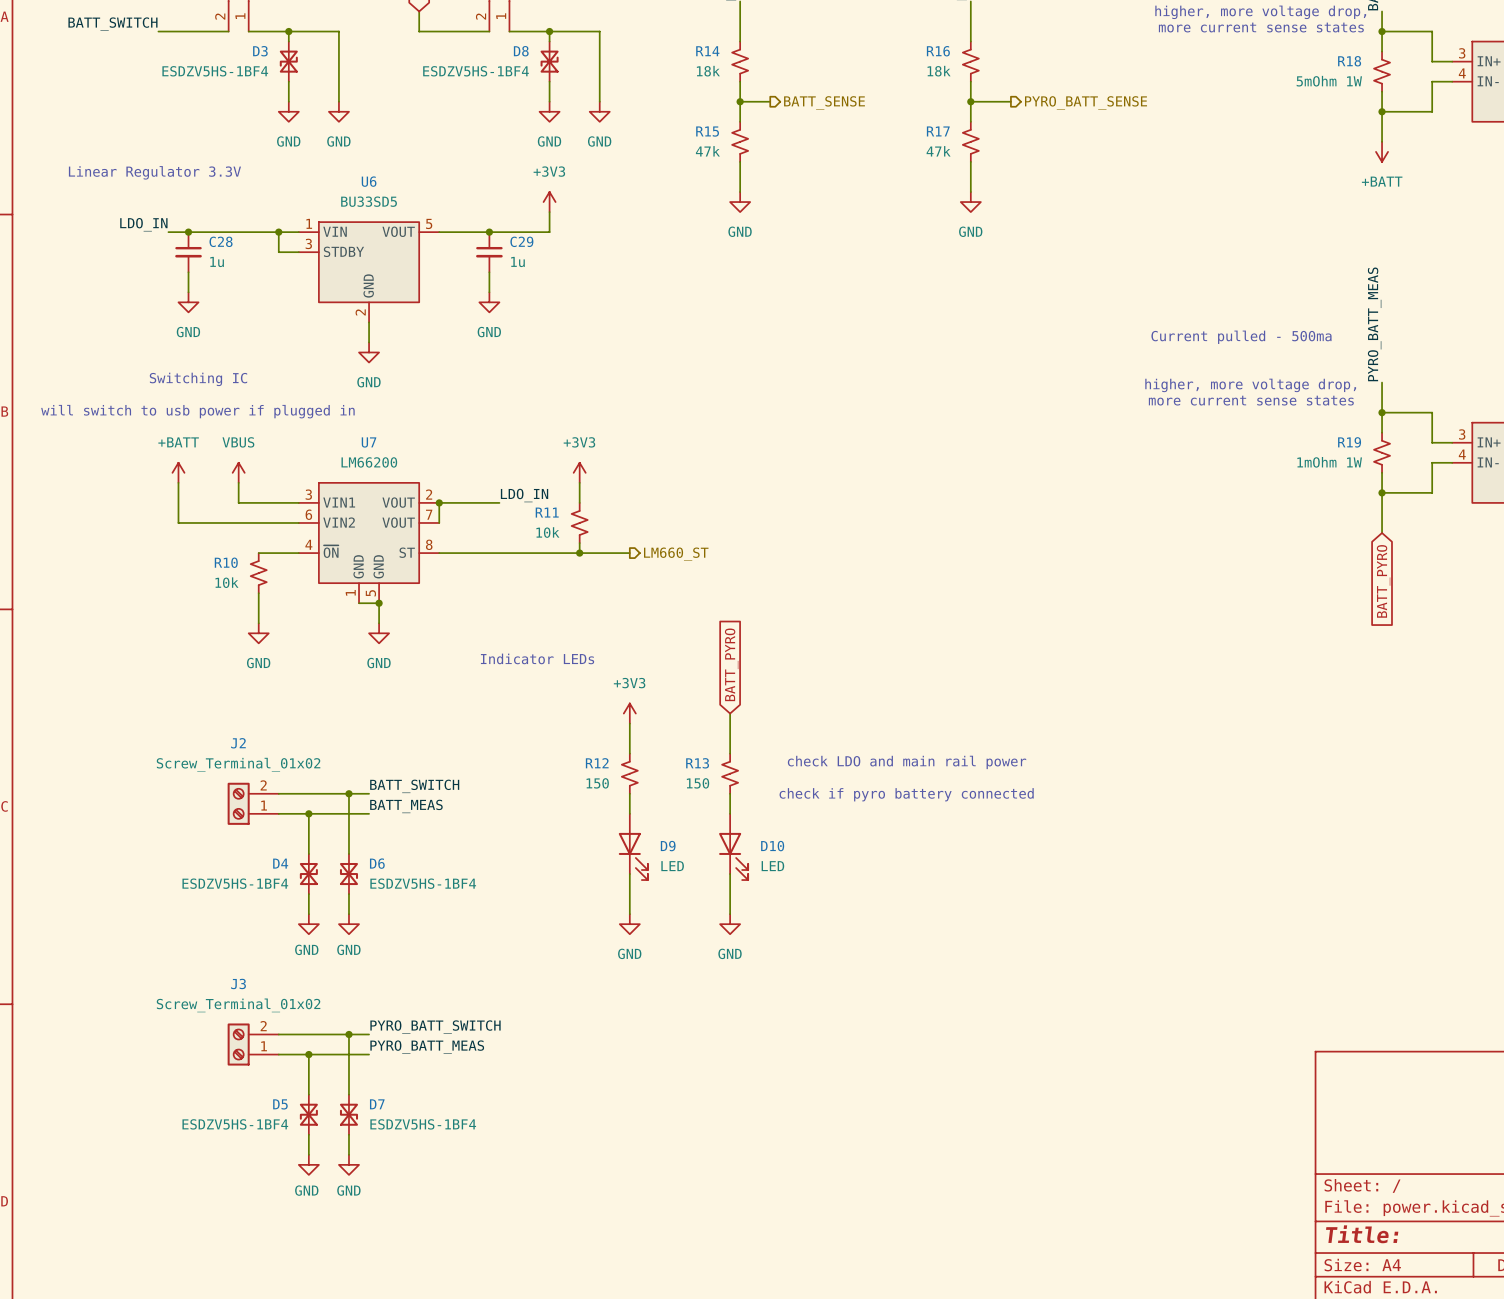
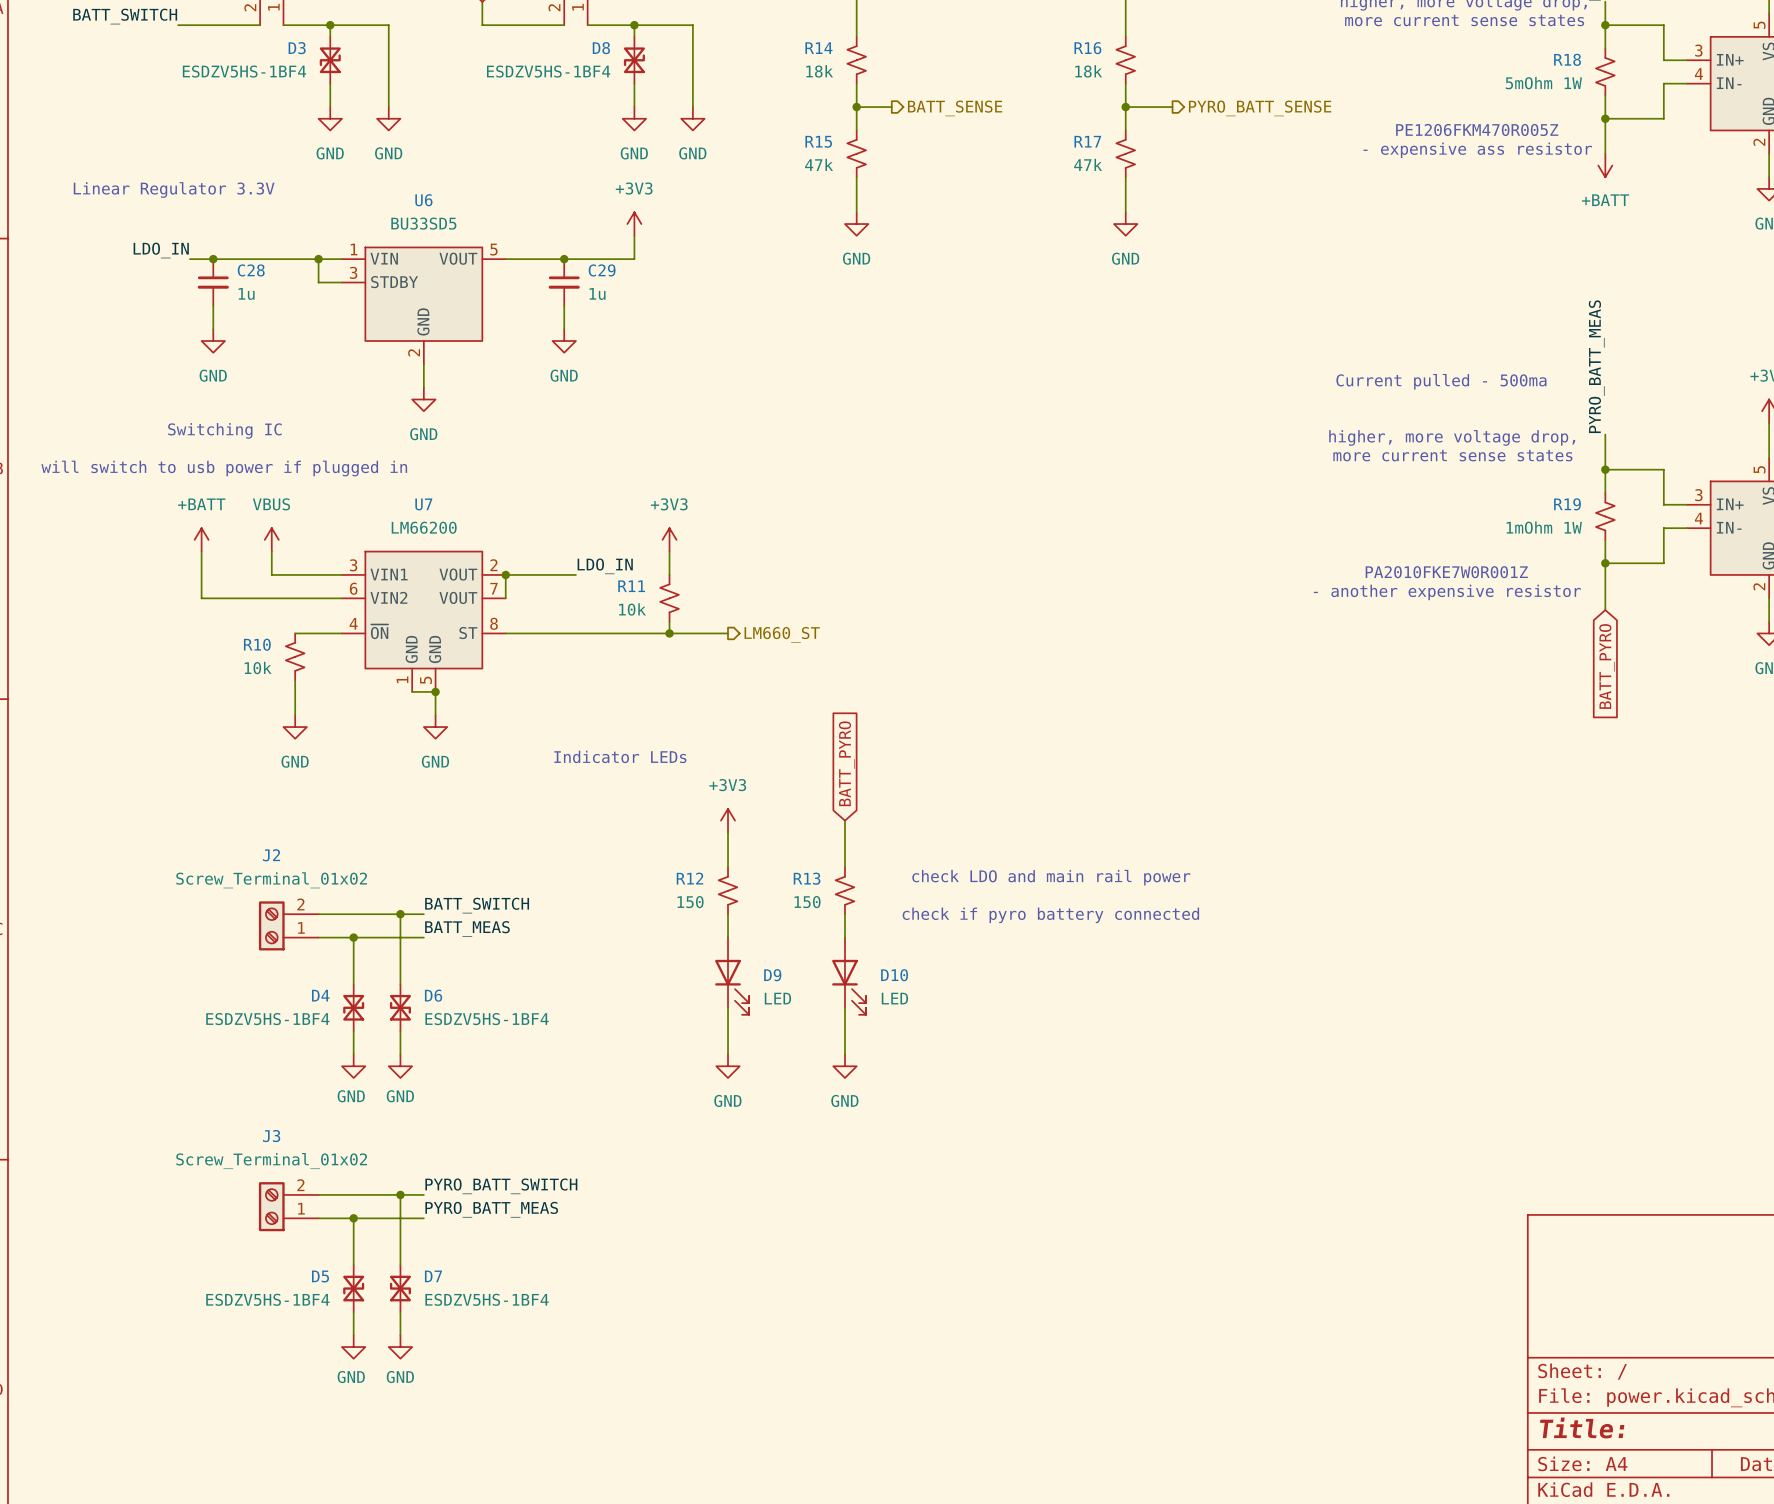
text: none -> PE1206FKM470R005Z (1477, 129)
text: none -> - expensive ass resistor (1477, 150)
text: none -> PA2010FKE7W0R001Z (1446, 572)
text: none -> - another expensive resistor (1447, 592)

